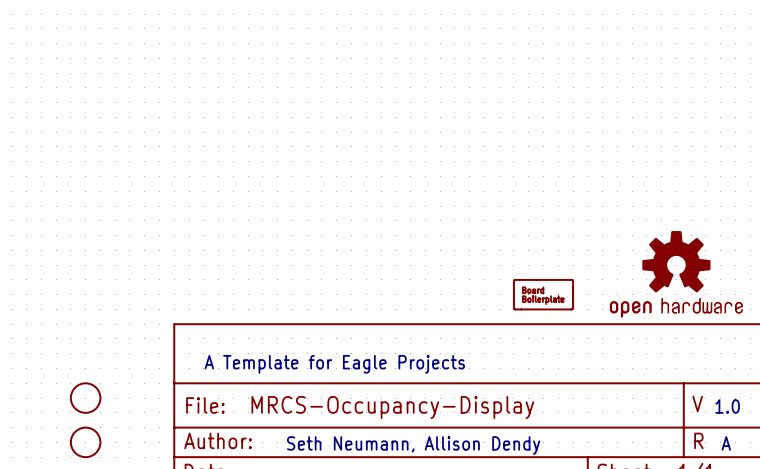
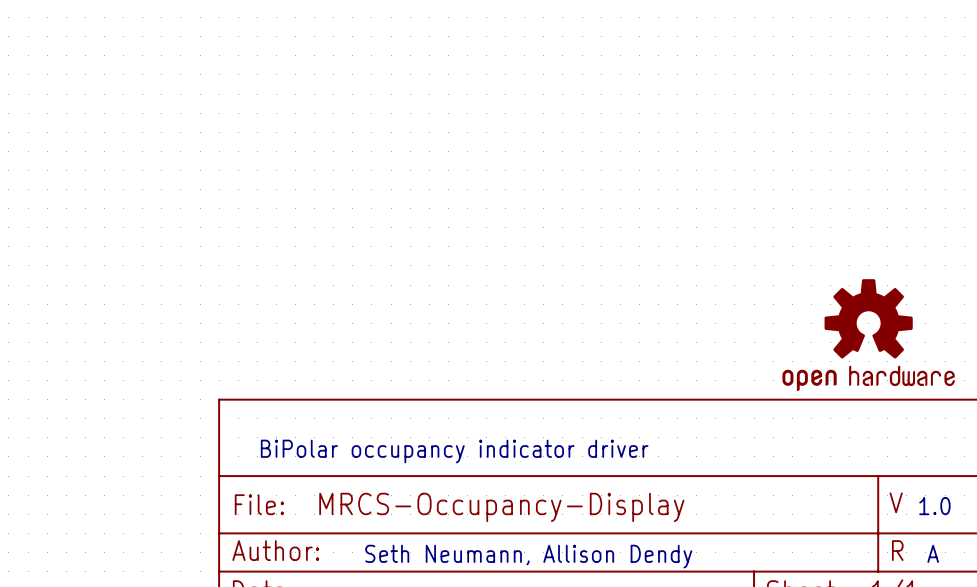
part: (543, 294) -> none
text: A Template for Eagle Projects (334, 364) -> BiPolar occupancy indicator driver (454, 451)
part: (85, 398) -> none
part: (85, 442) -> none

